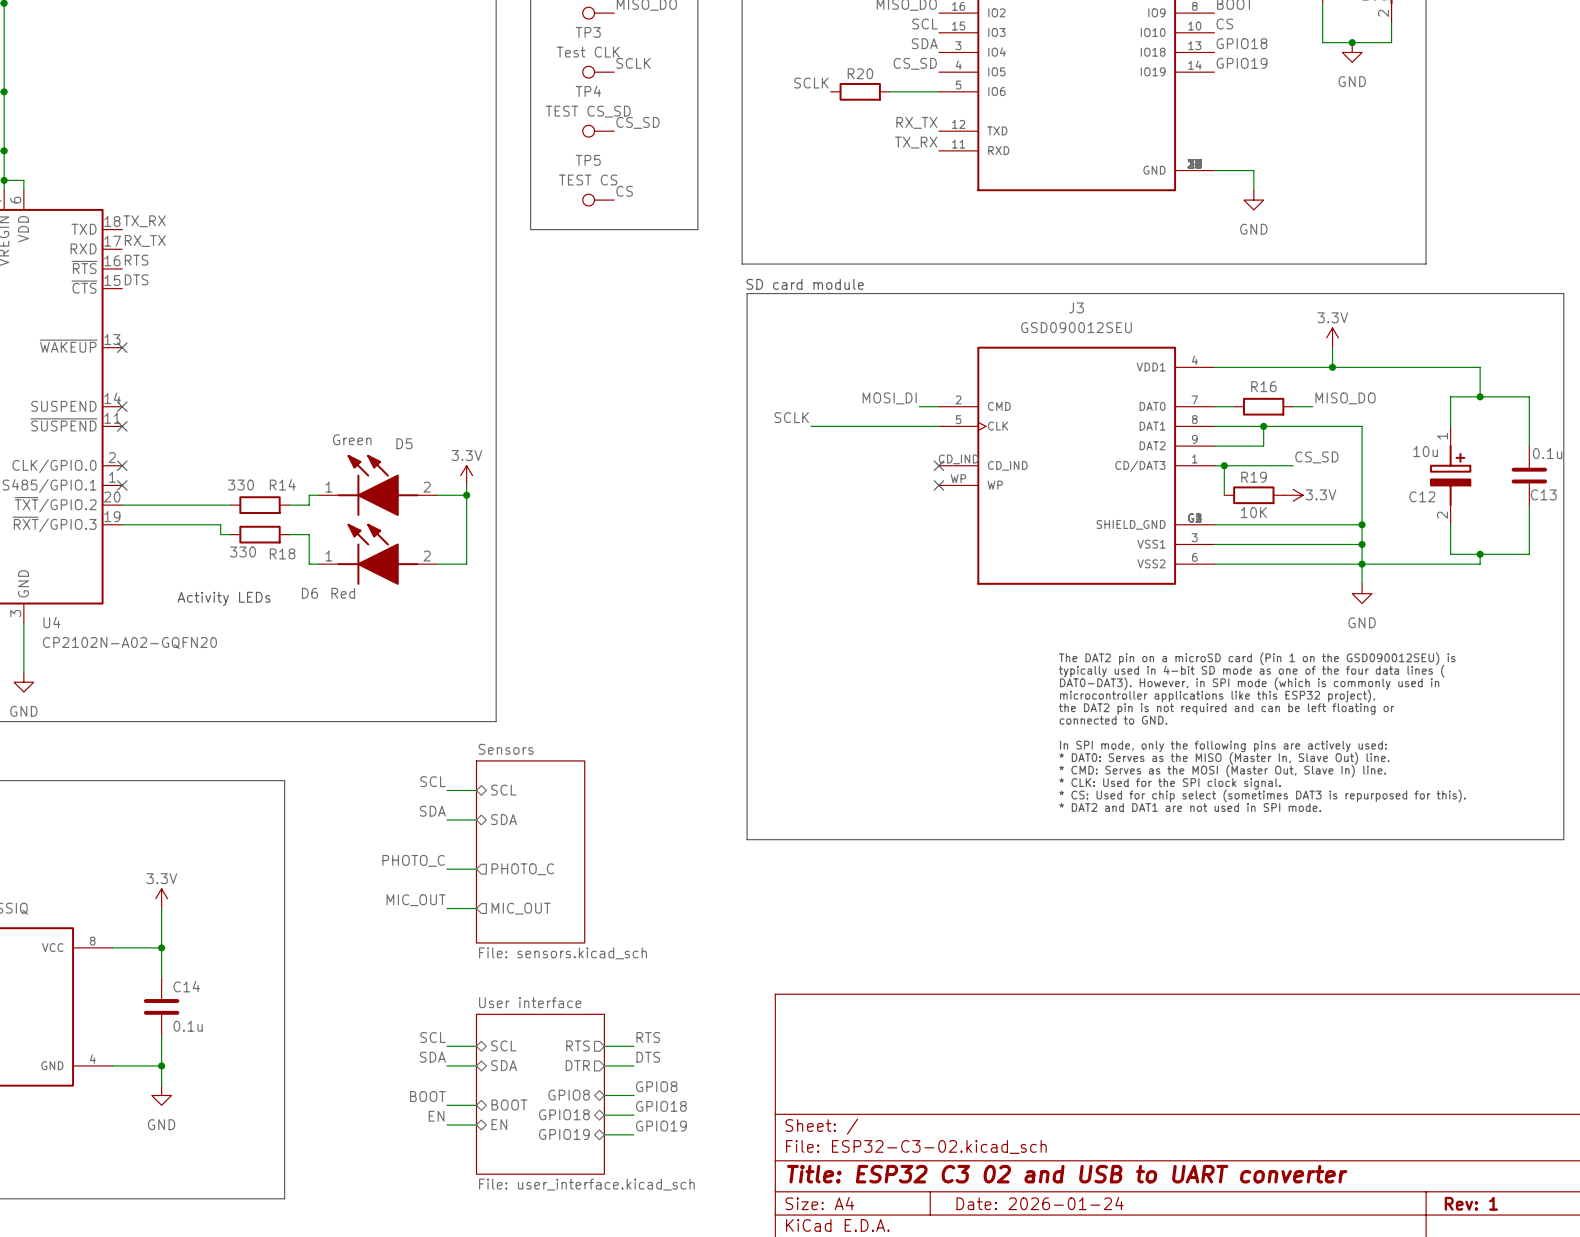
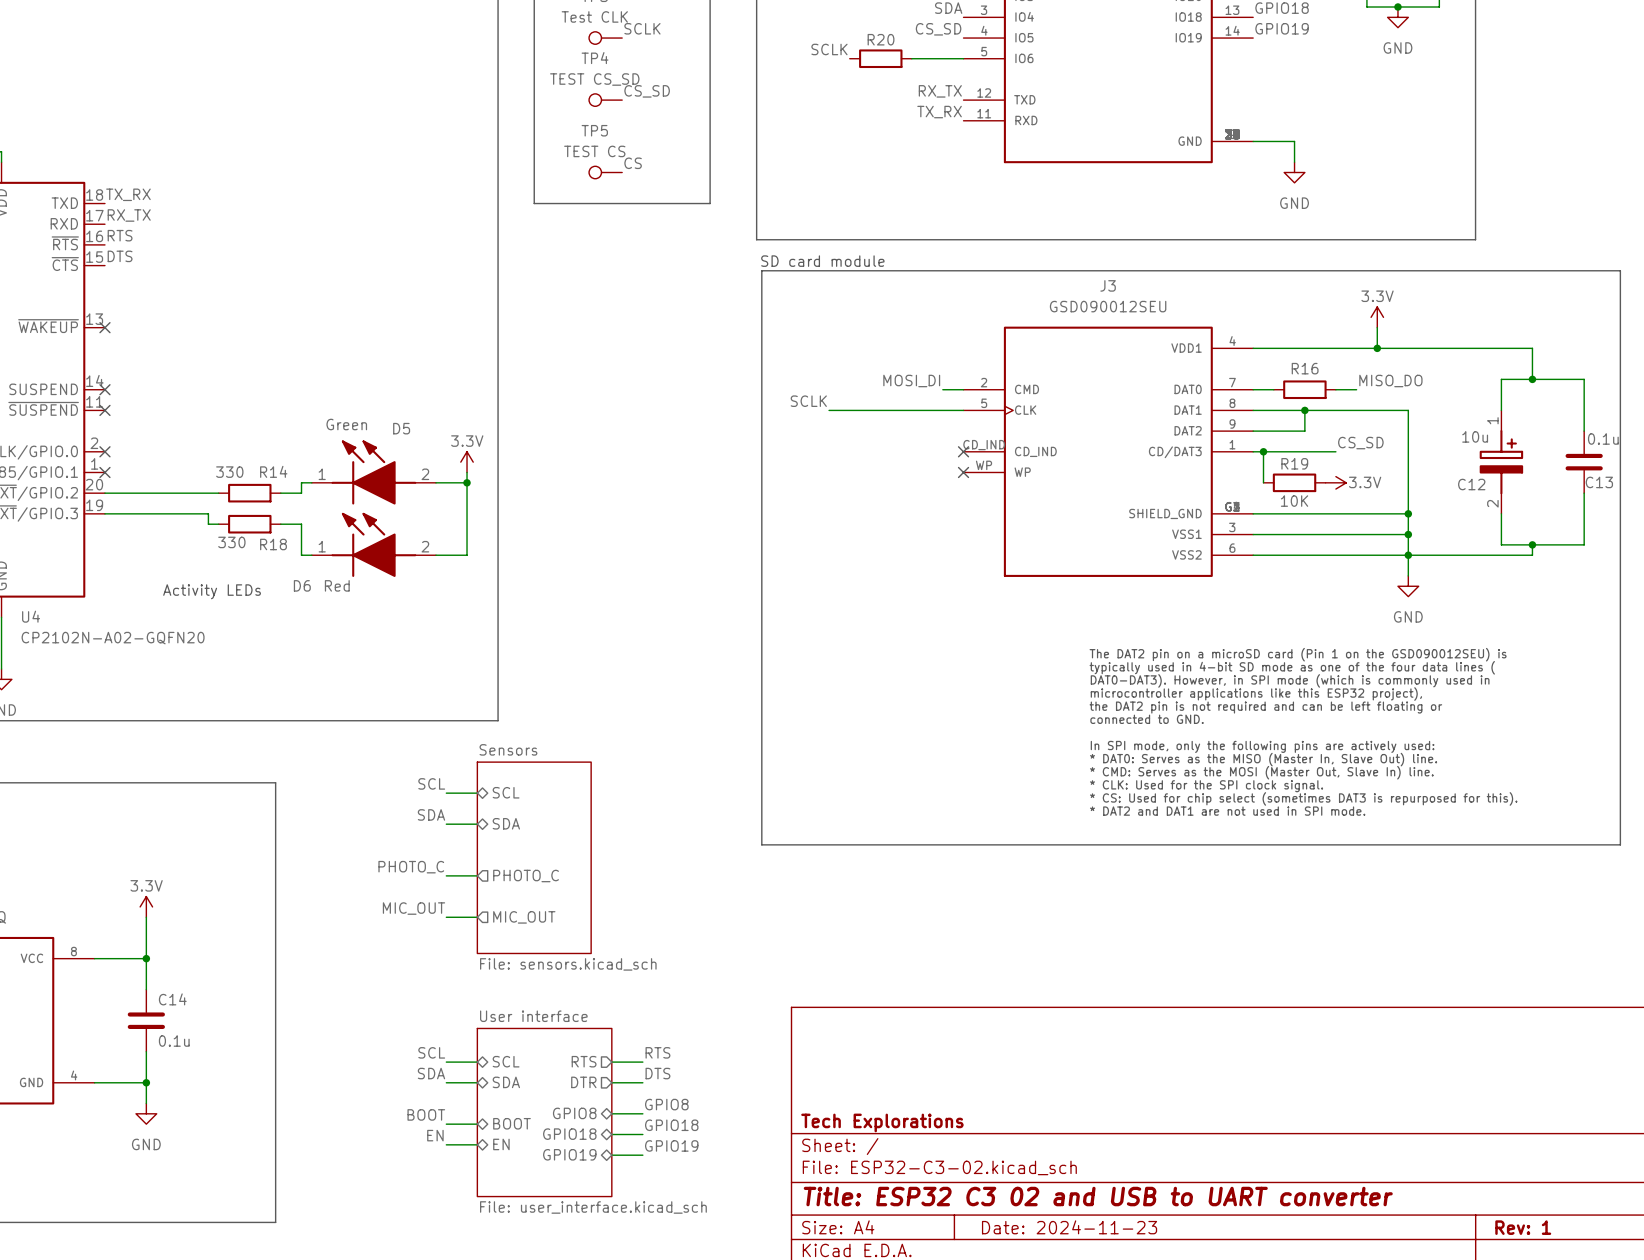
title block: none -> Tech Explorations (882, 1122)
title block: Date: 2026-01-24 (1040, 1203) -> Date: 2024-11-23 (1069, 1227)

